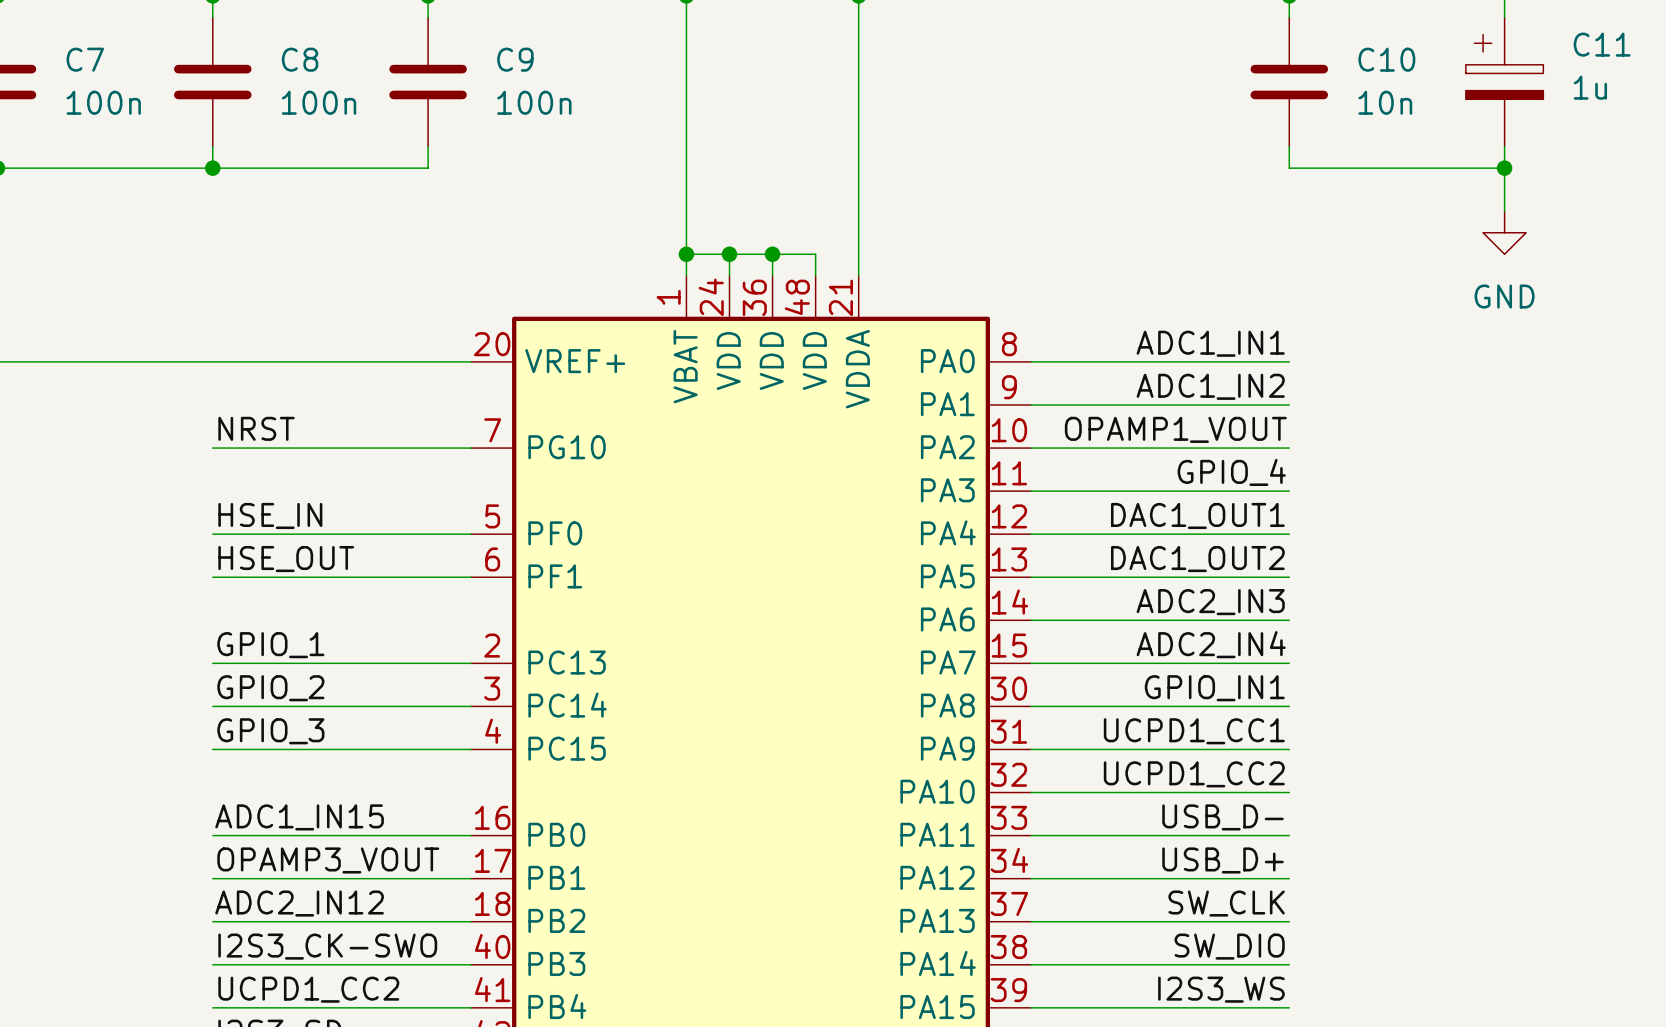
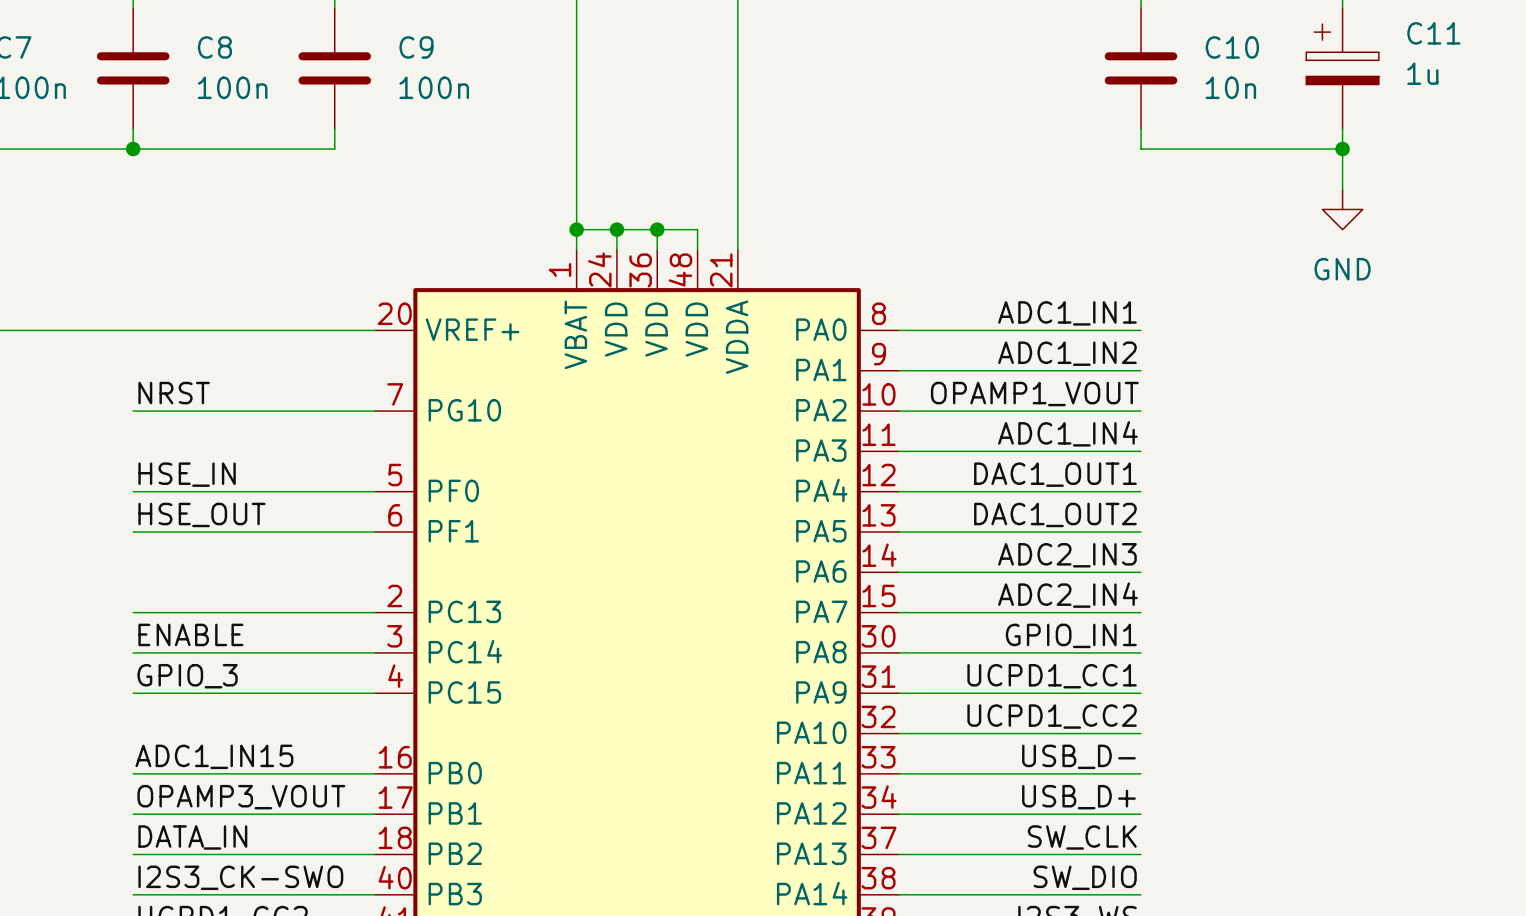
label: GPIO_4 (1231, 472) -> ADC1_IN4 (1067, 433)
label: GPIO_1 (270, 645) -> none
label: GPIO_2 (270, 688) -> ENABLE (190, 634)
label: ADC2_IN12 (299, 903) -> DATA_IN (192, 837)

